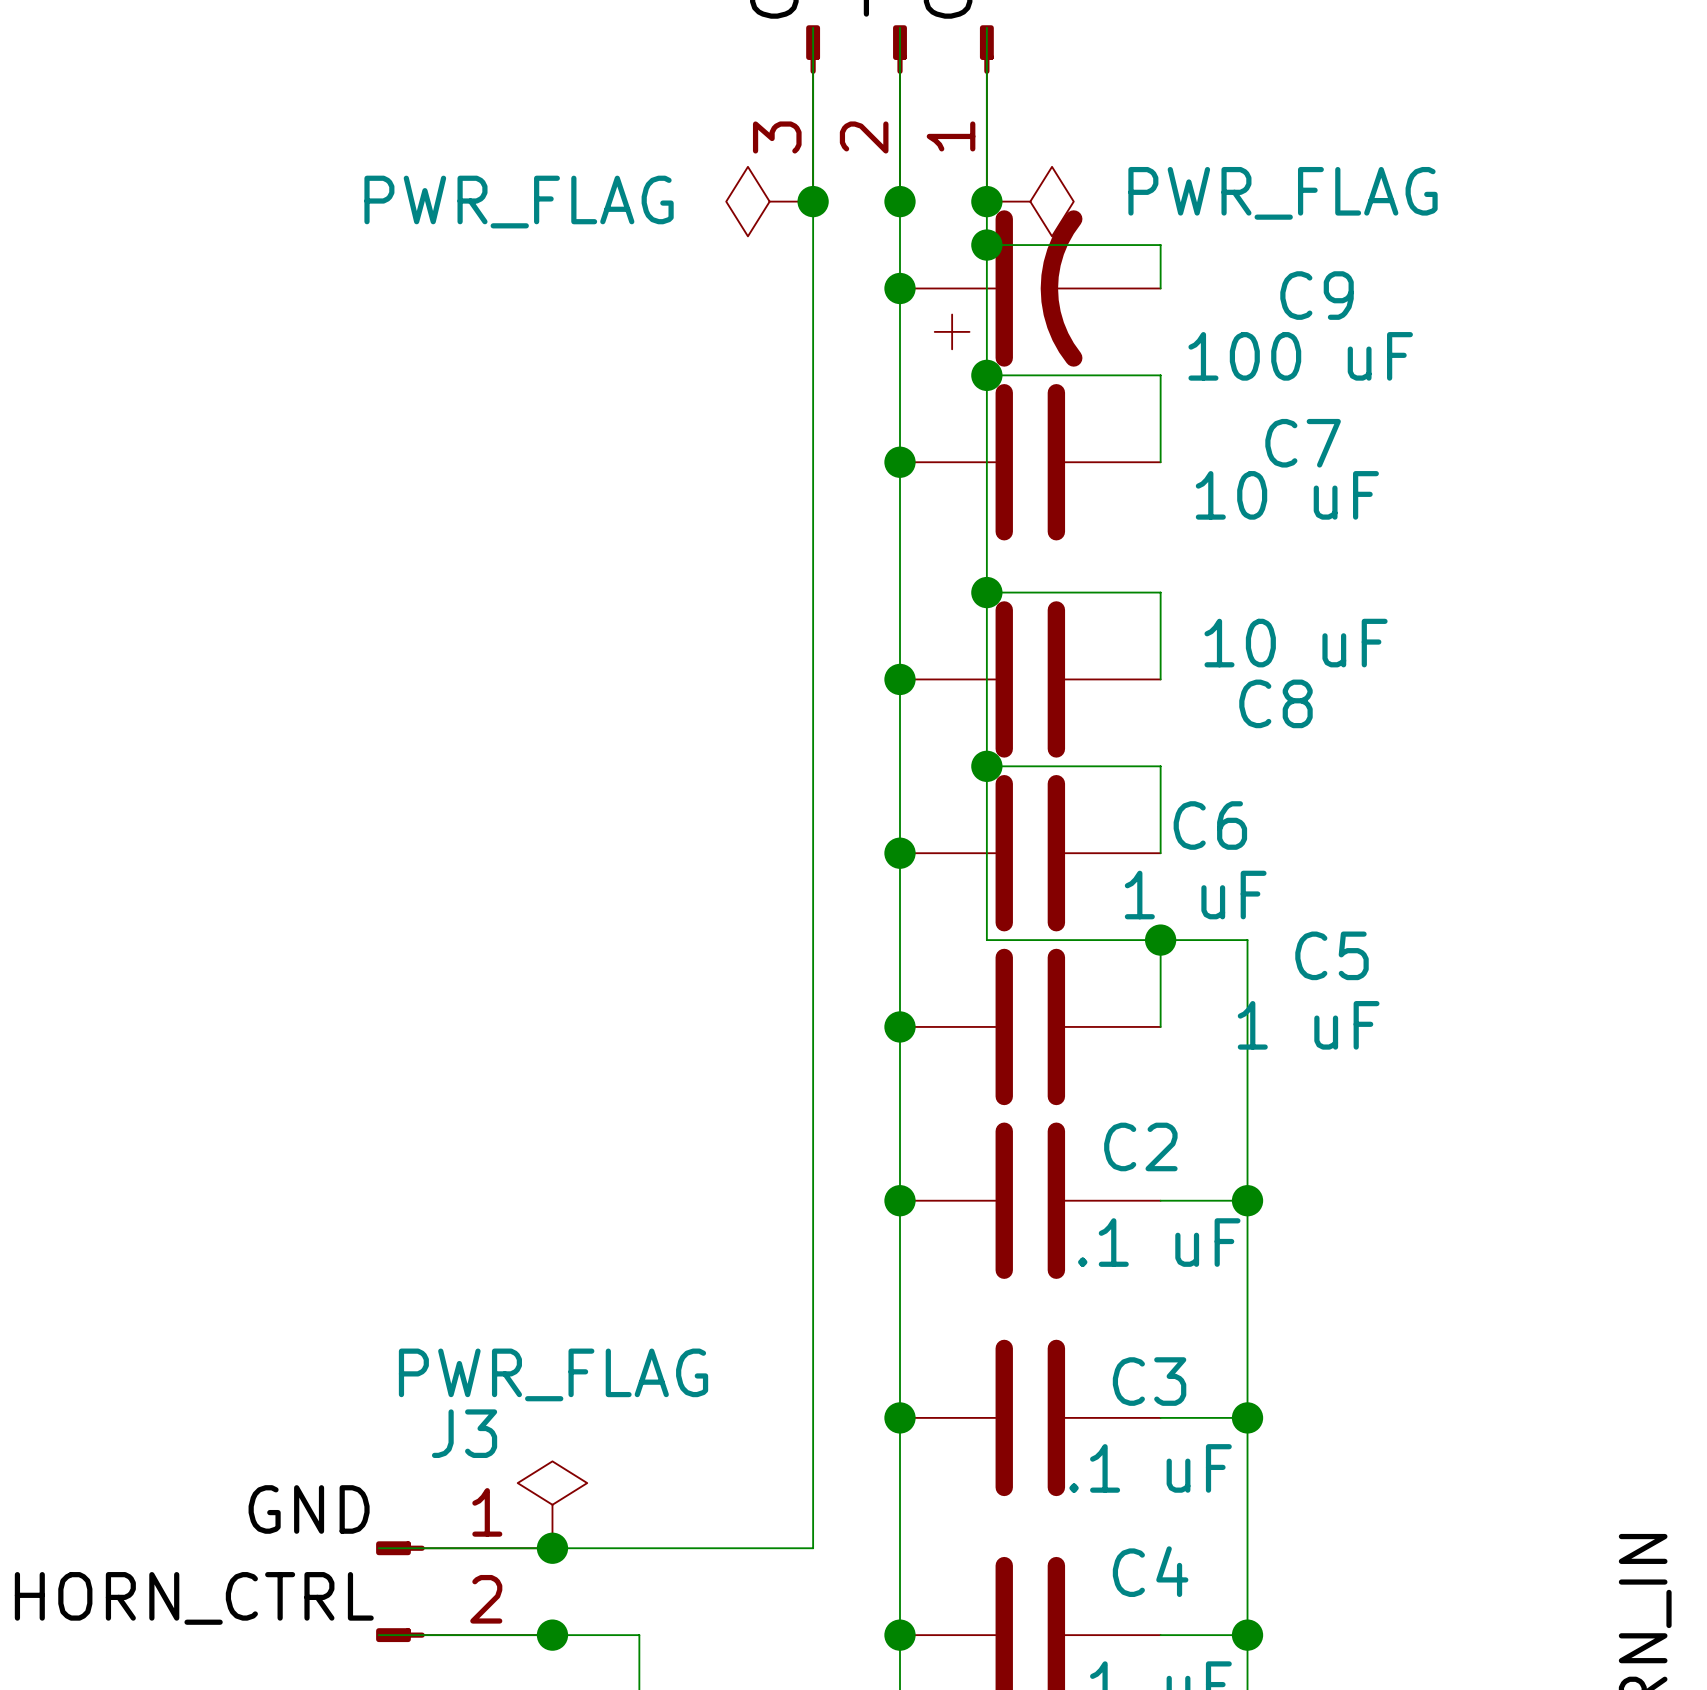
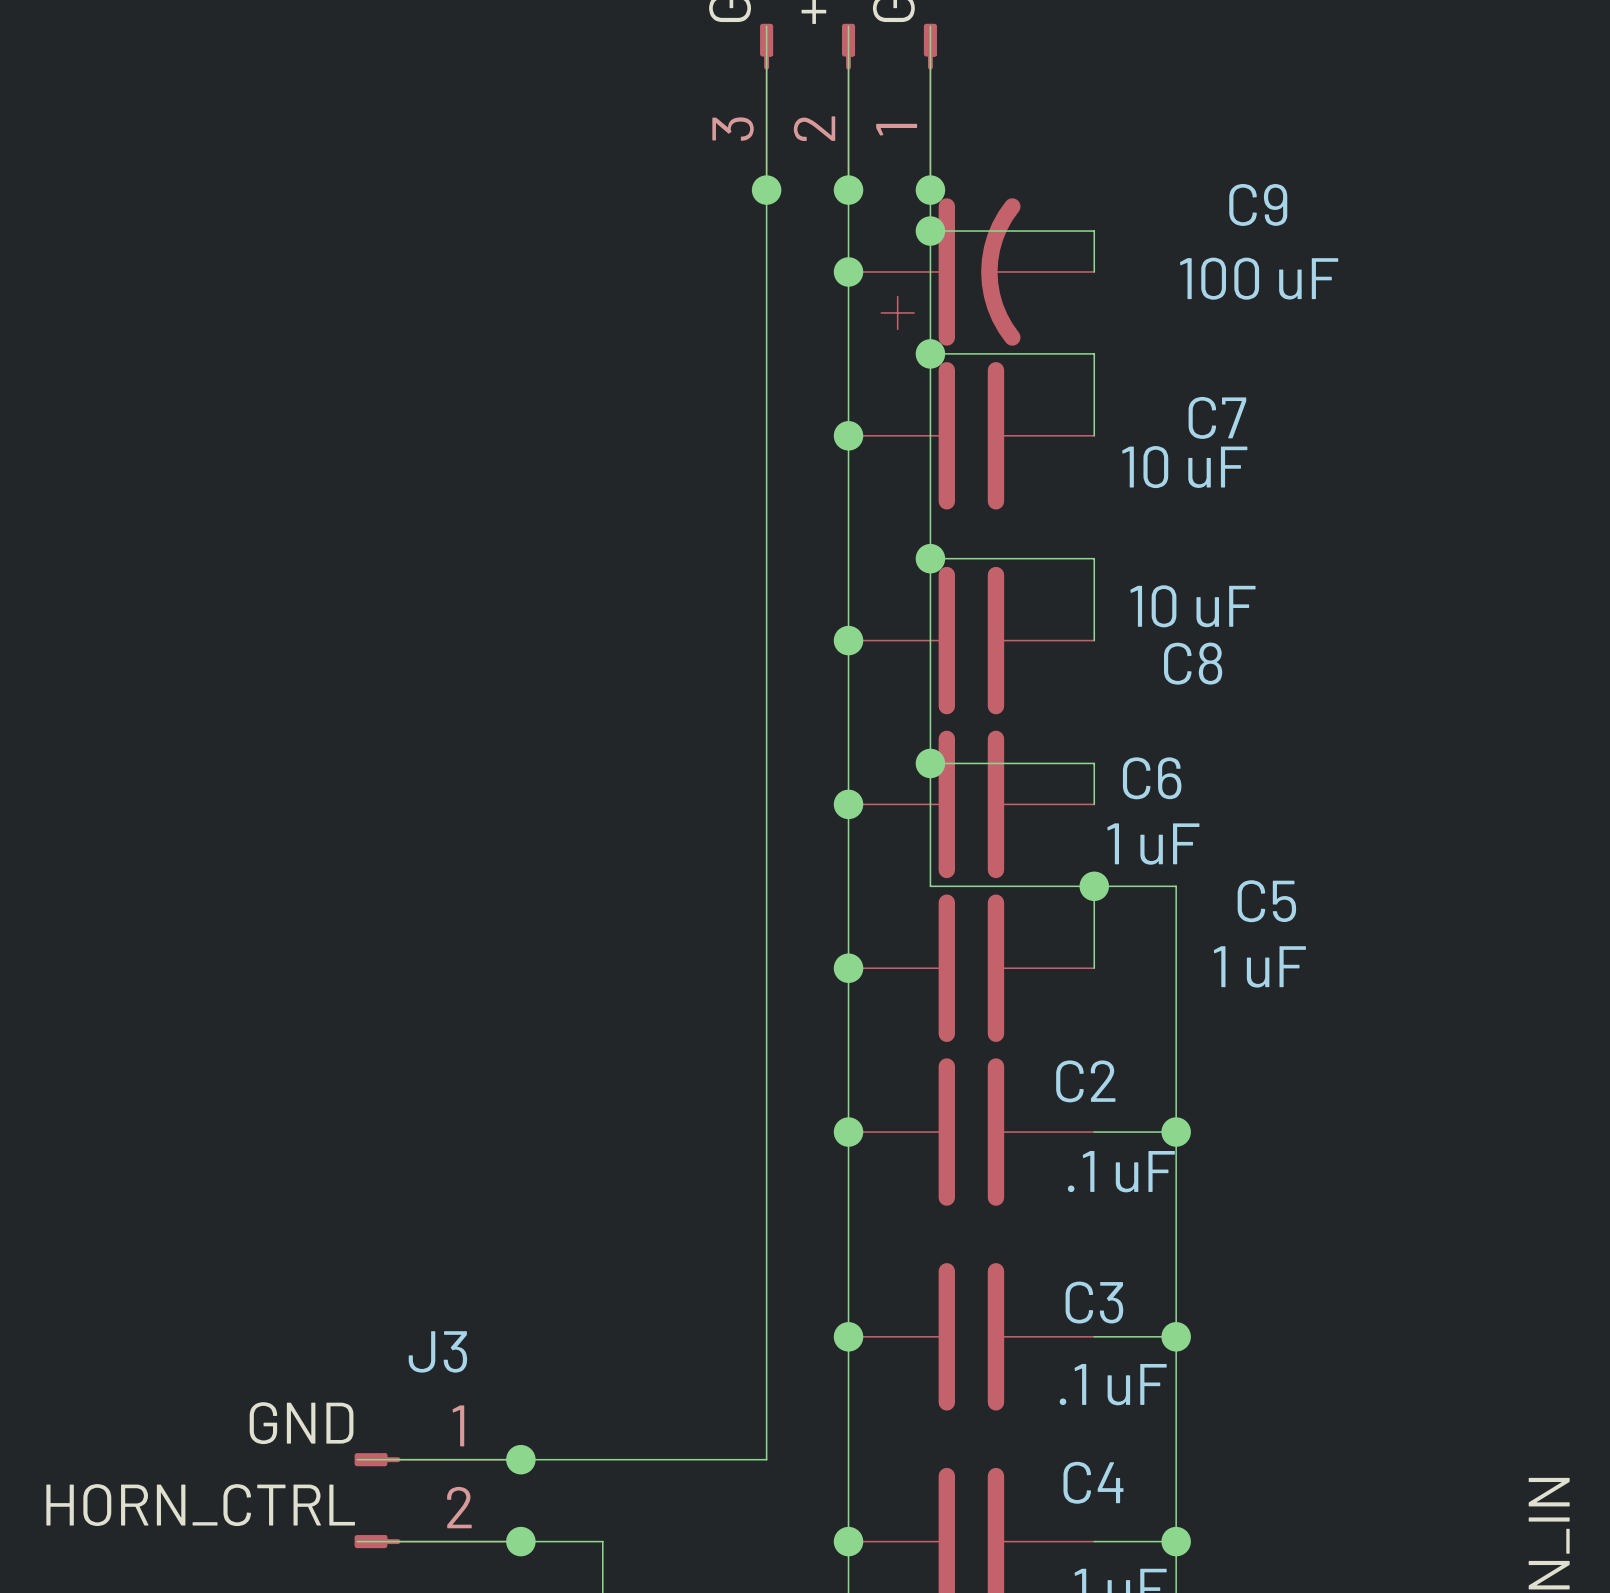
power symbol: PWR_FLAG (769, 201) -> none
power symbol: PWR_FLAG (1030, 201) -> none
C9 name position: C9 (1317, 295) -> C9 (1258, 204)
C9 value position: 100 uF (1300, 356) -> 100 uF (1259, 278)
wire: (986, 766) (1160, 766) (1160, 809) -> (930, 763) (1094, 763)
junction position: (986, 766) -> (930, 763)
power symbol: PWR_FLAG (552, 1504) -> none

